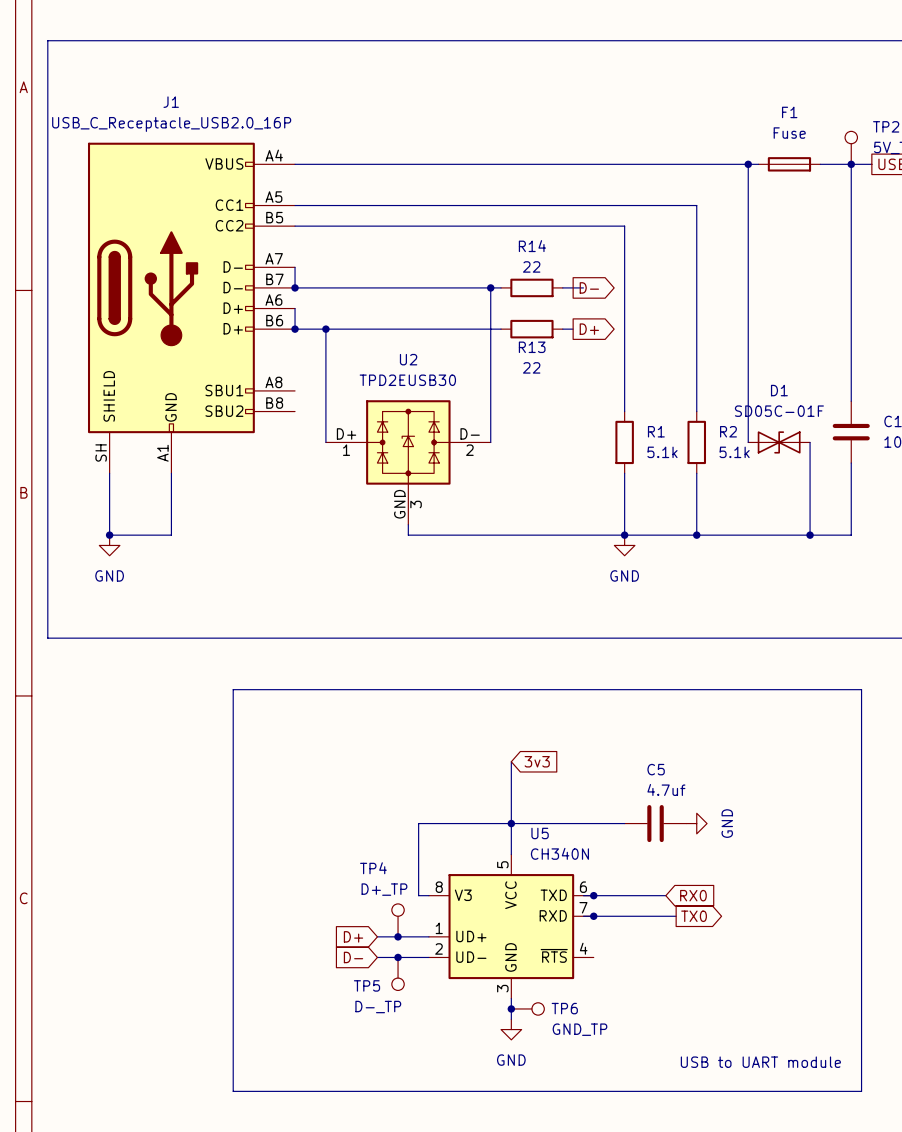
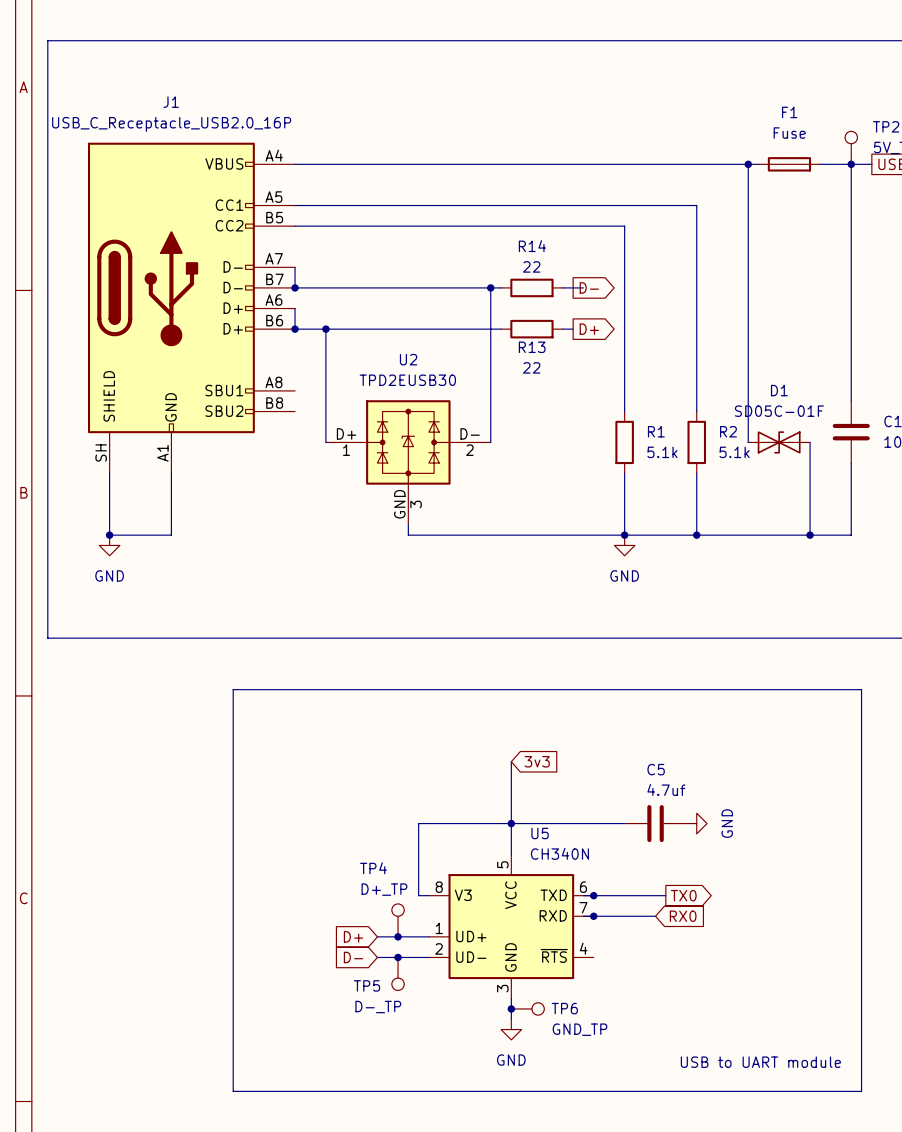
global label shape: input (693, 895) -> output (683, 895)
global label: RX0 (693, 895) -> TX0 (683, 895)
wire: (655, 916) (676, 916) -> none
global label shape: output (694, 916) -> input (683, 916)
global label: TX0 (694, 916) -> RX0 (683, 916)

